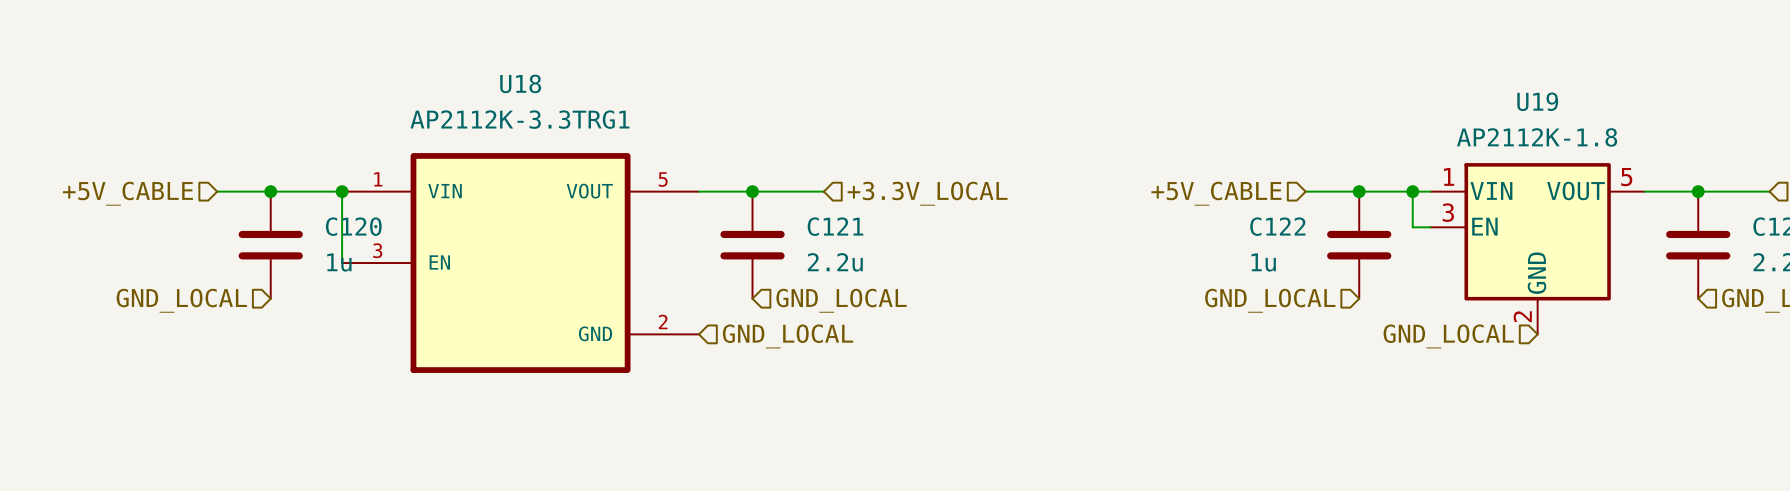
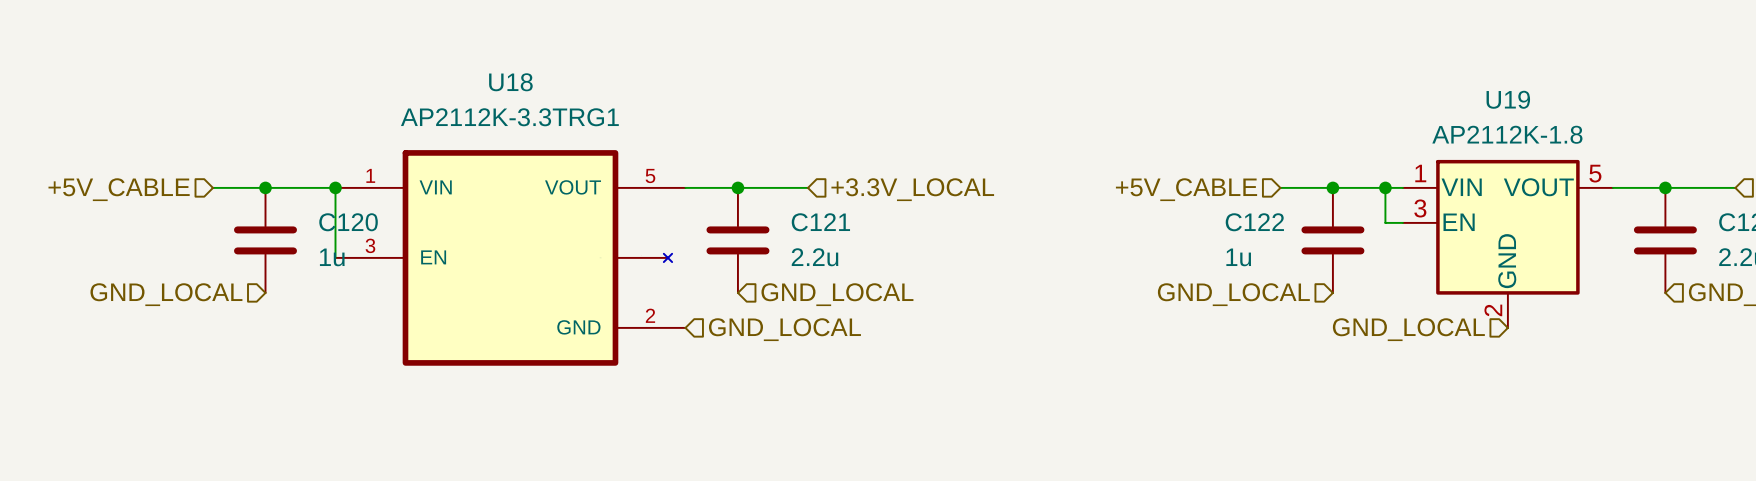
U18 symbol: [342, 153, 699, 373] -> [335, 150, 686, 366]

